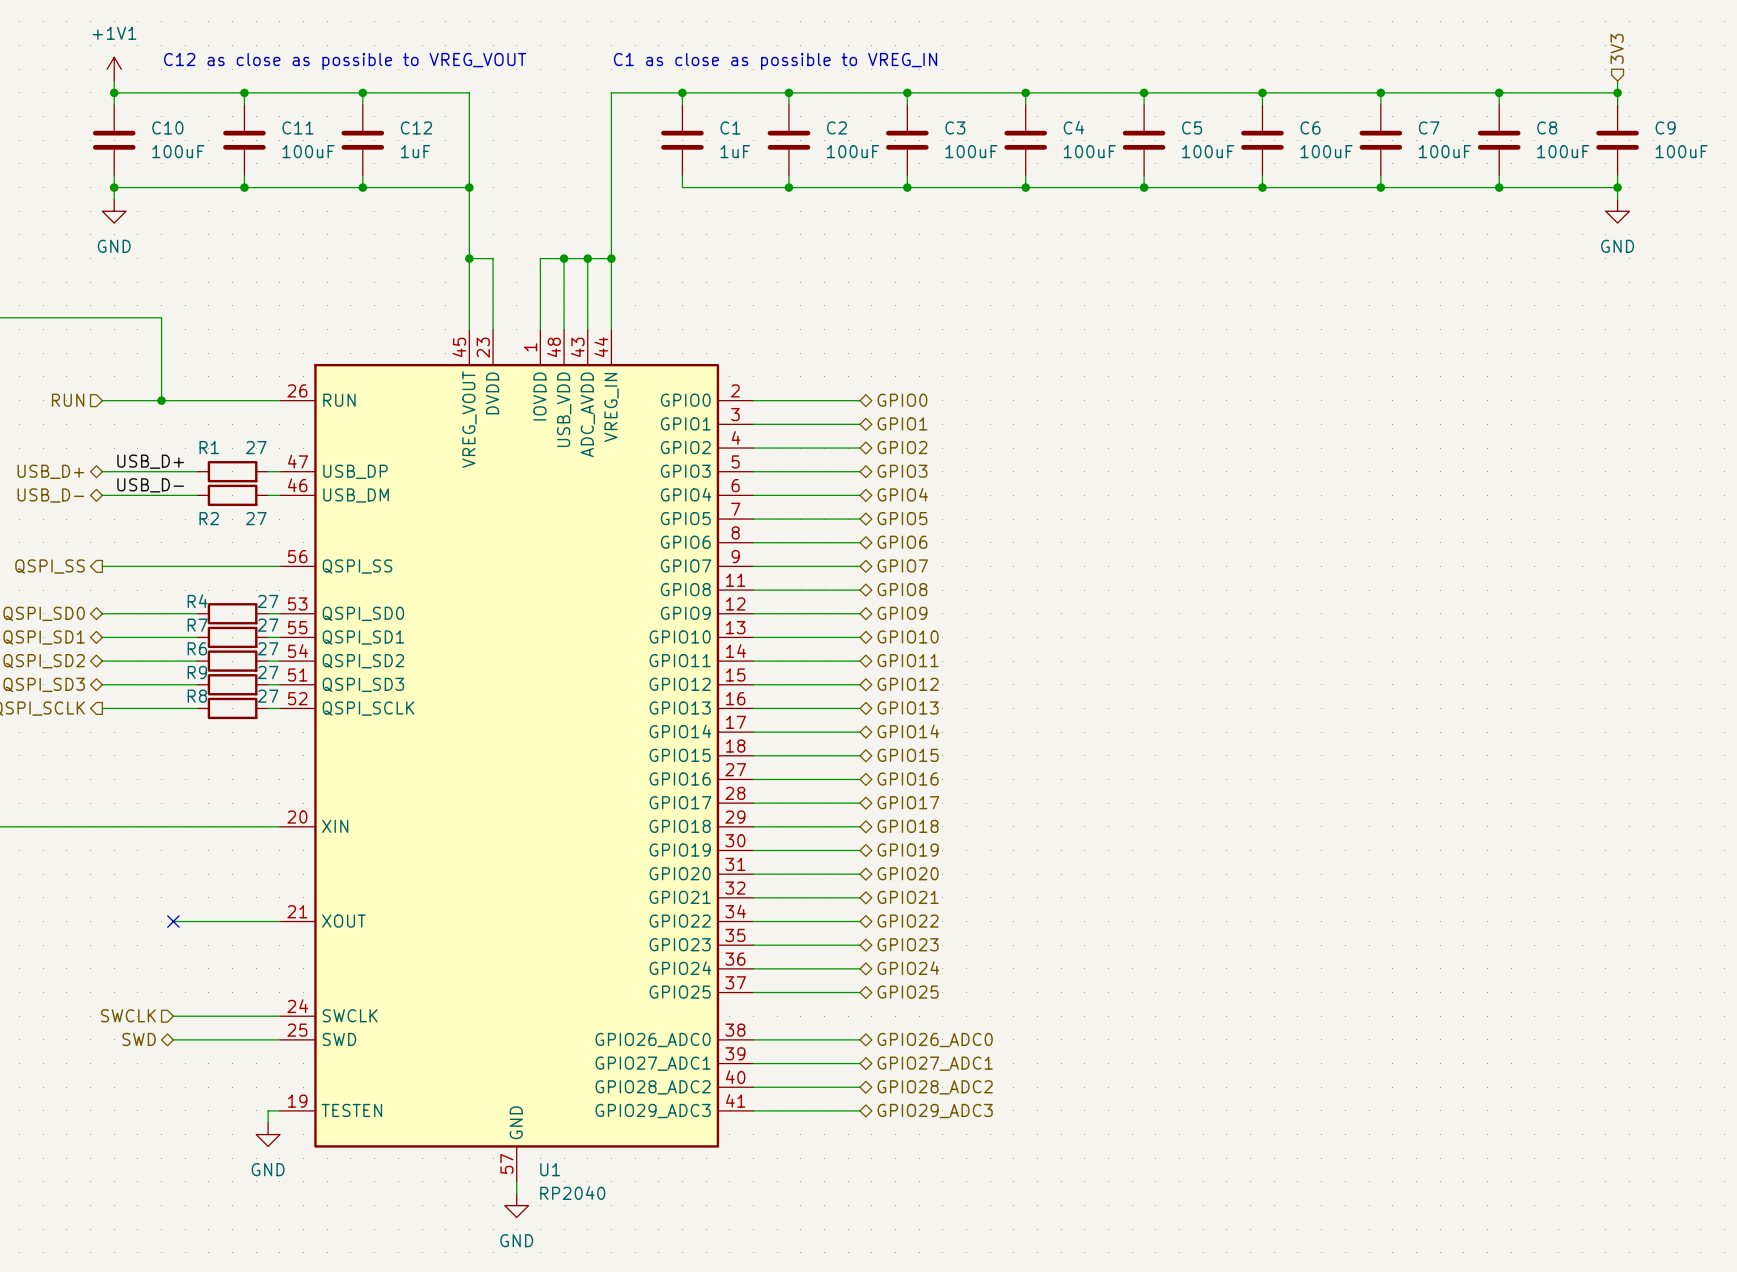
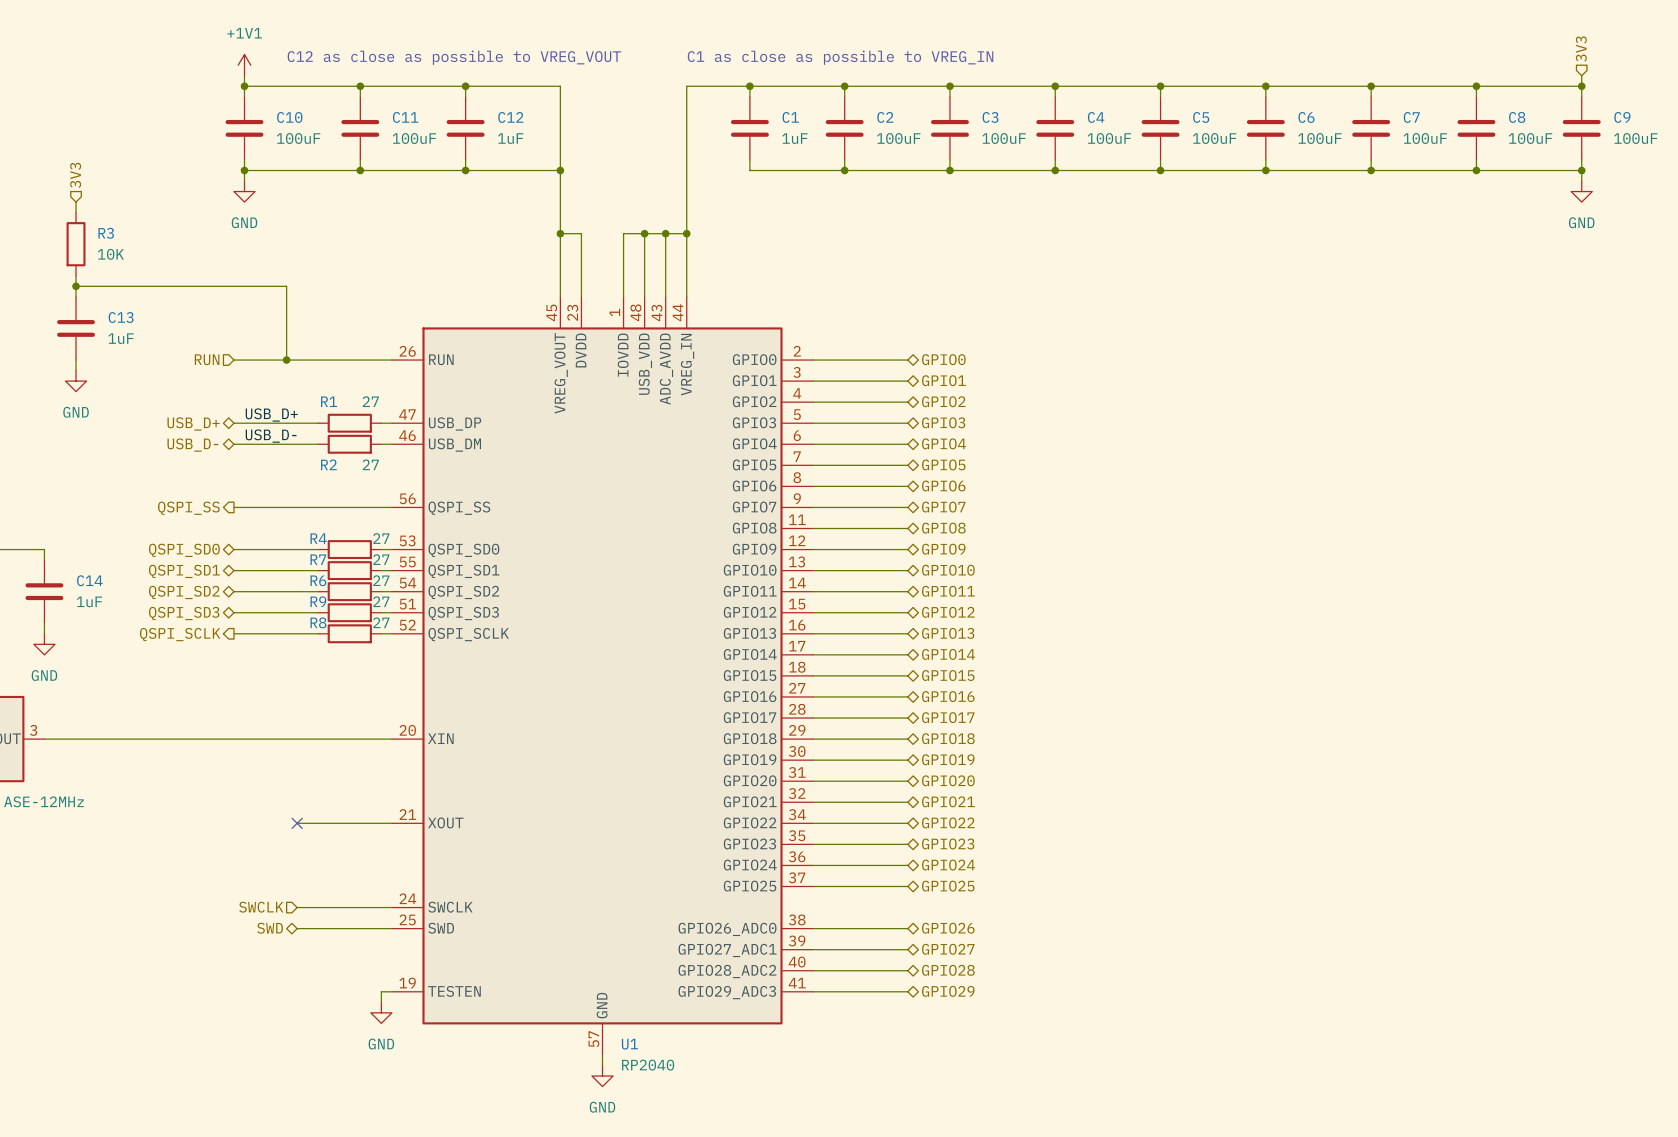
hierarchical label: GPIO26_ADC0 (935, 1040) -> GPIO26 (948, 928)
hierarchical label: GPIO27_ADC1 (935, 1063) -> GPIO27 (948, 949)
hierarchical label: GPIO28_ADC2 (935, 1087) -> GPIO28 (948, 970)
hierarchical label: GPIO29_ADC3 (935, 1111) -> GPIO29 (948, 991)

